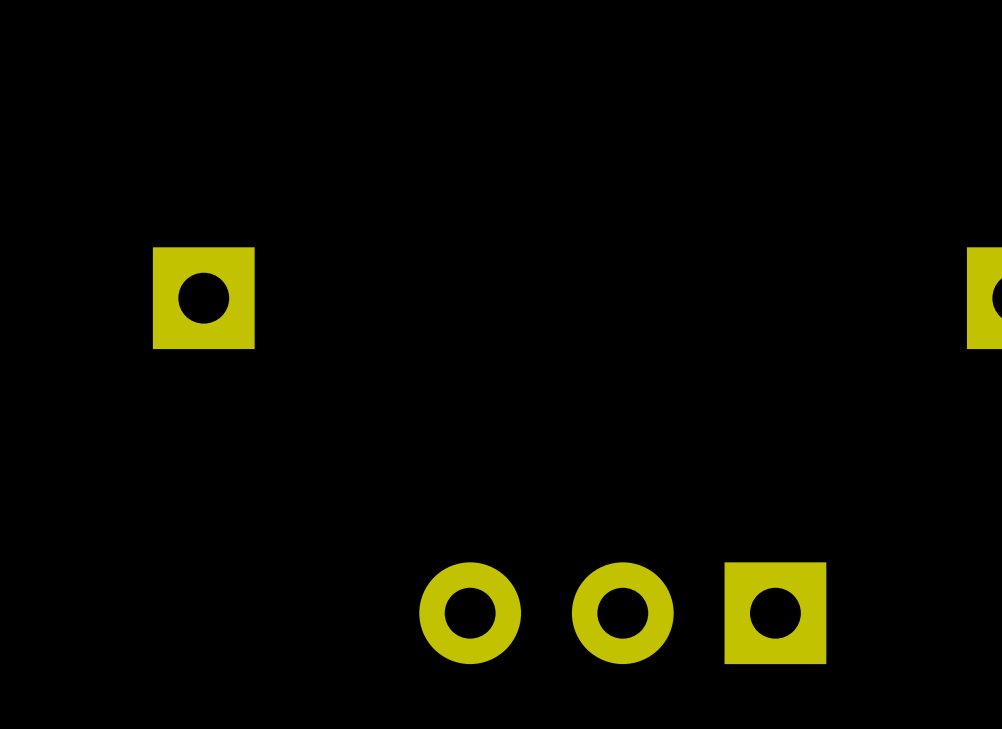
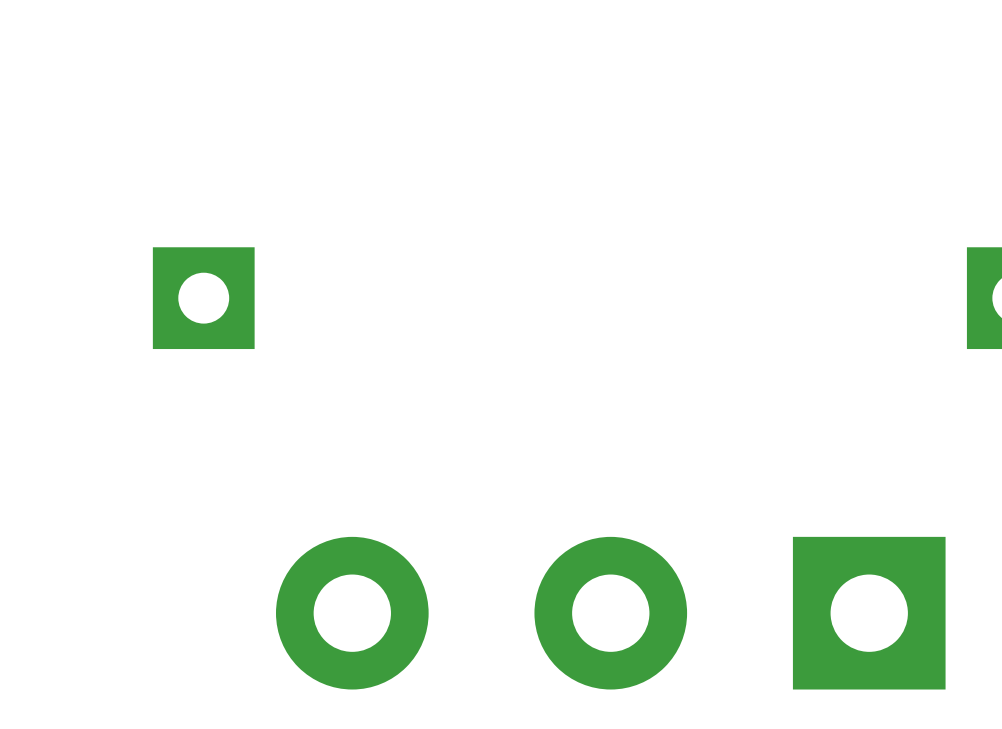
part footprint: [419, 562, 827, 665] -> [275, 536, 946, 690]

